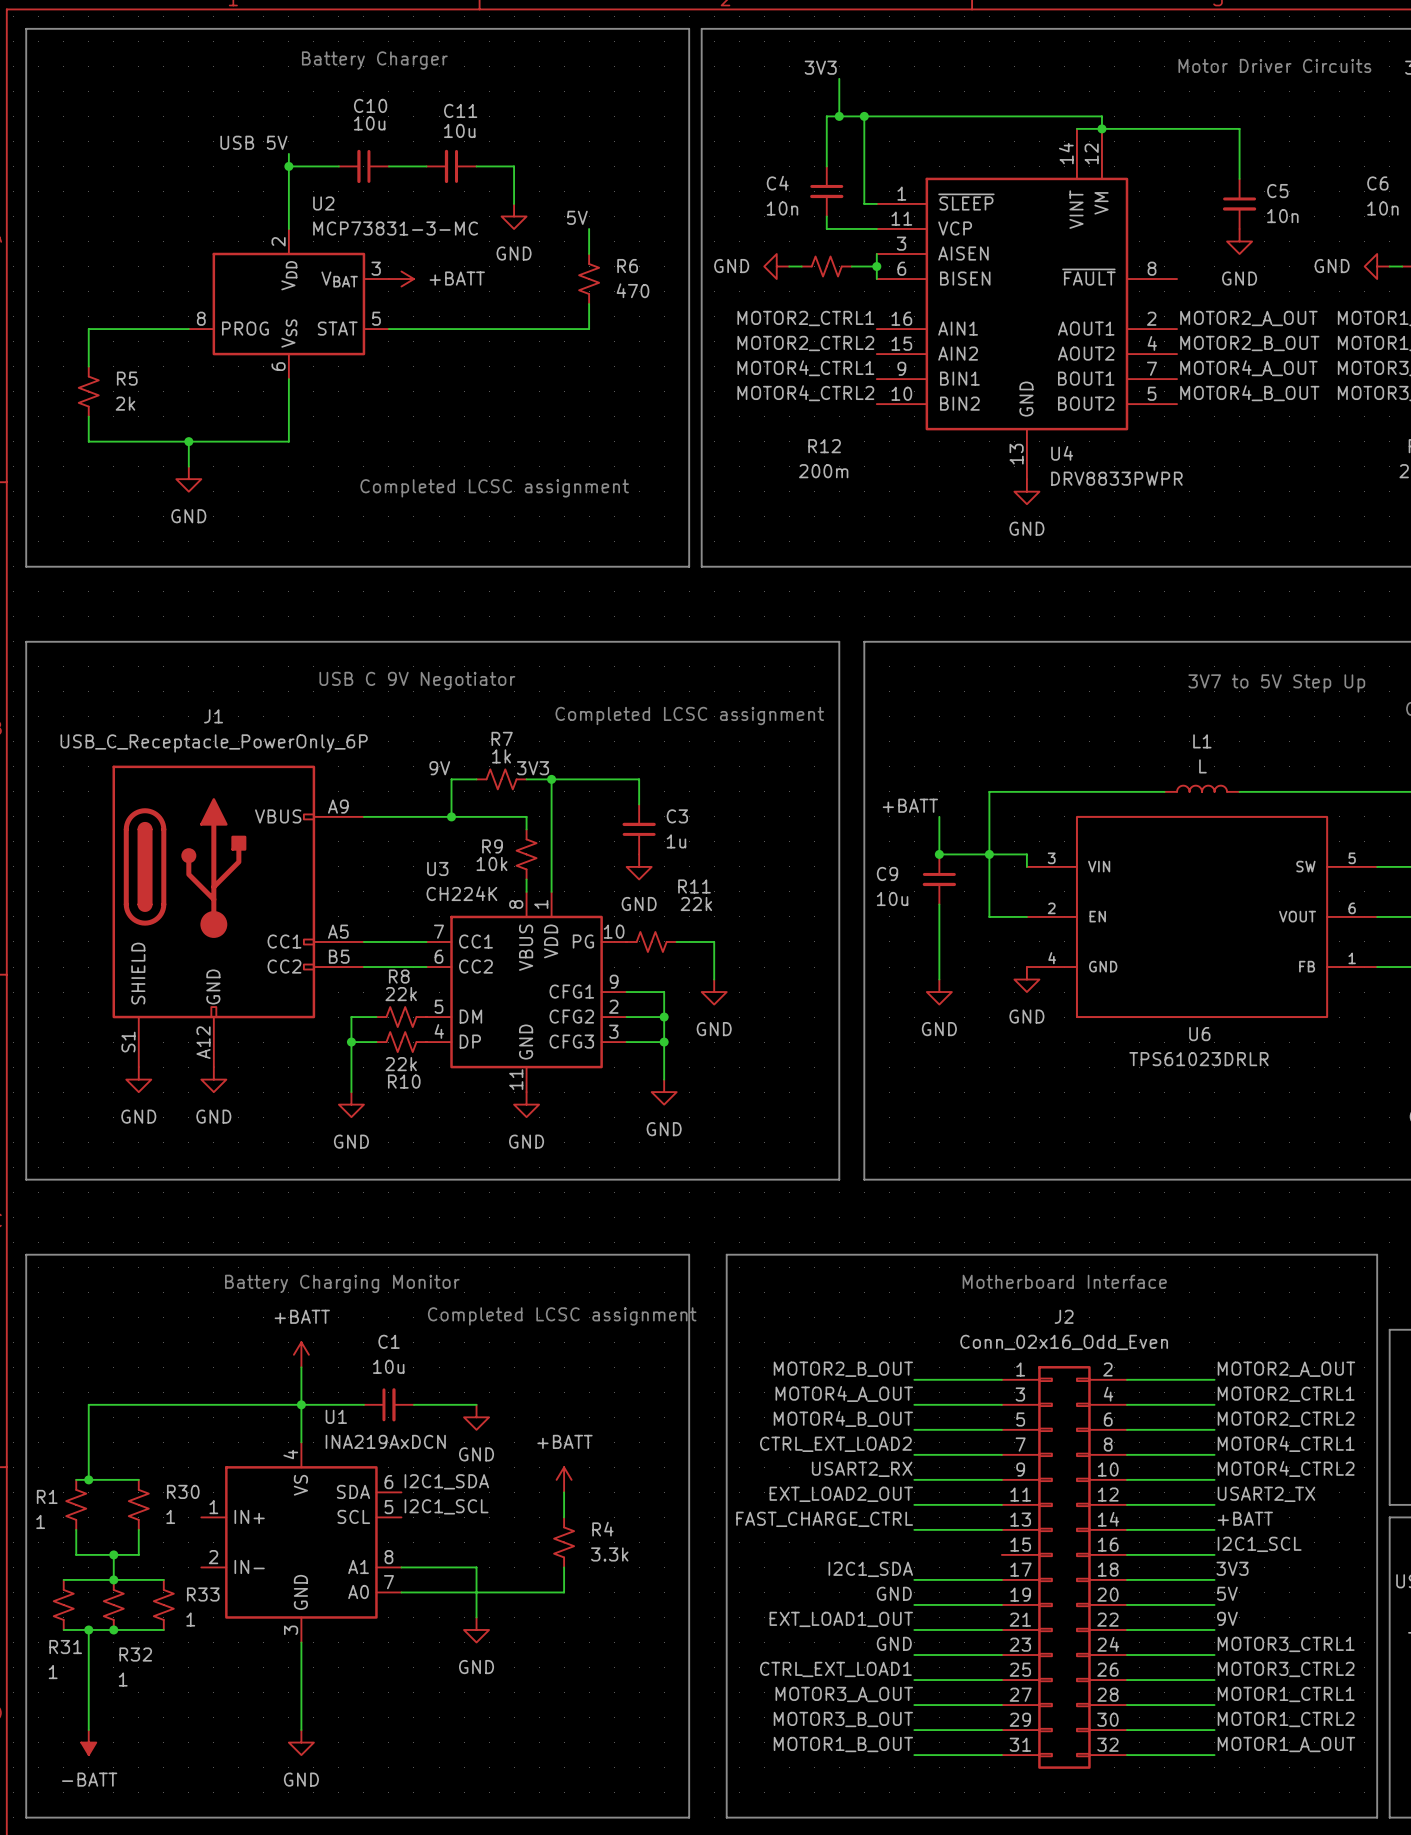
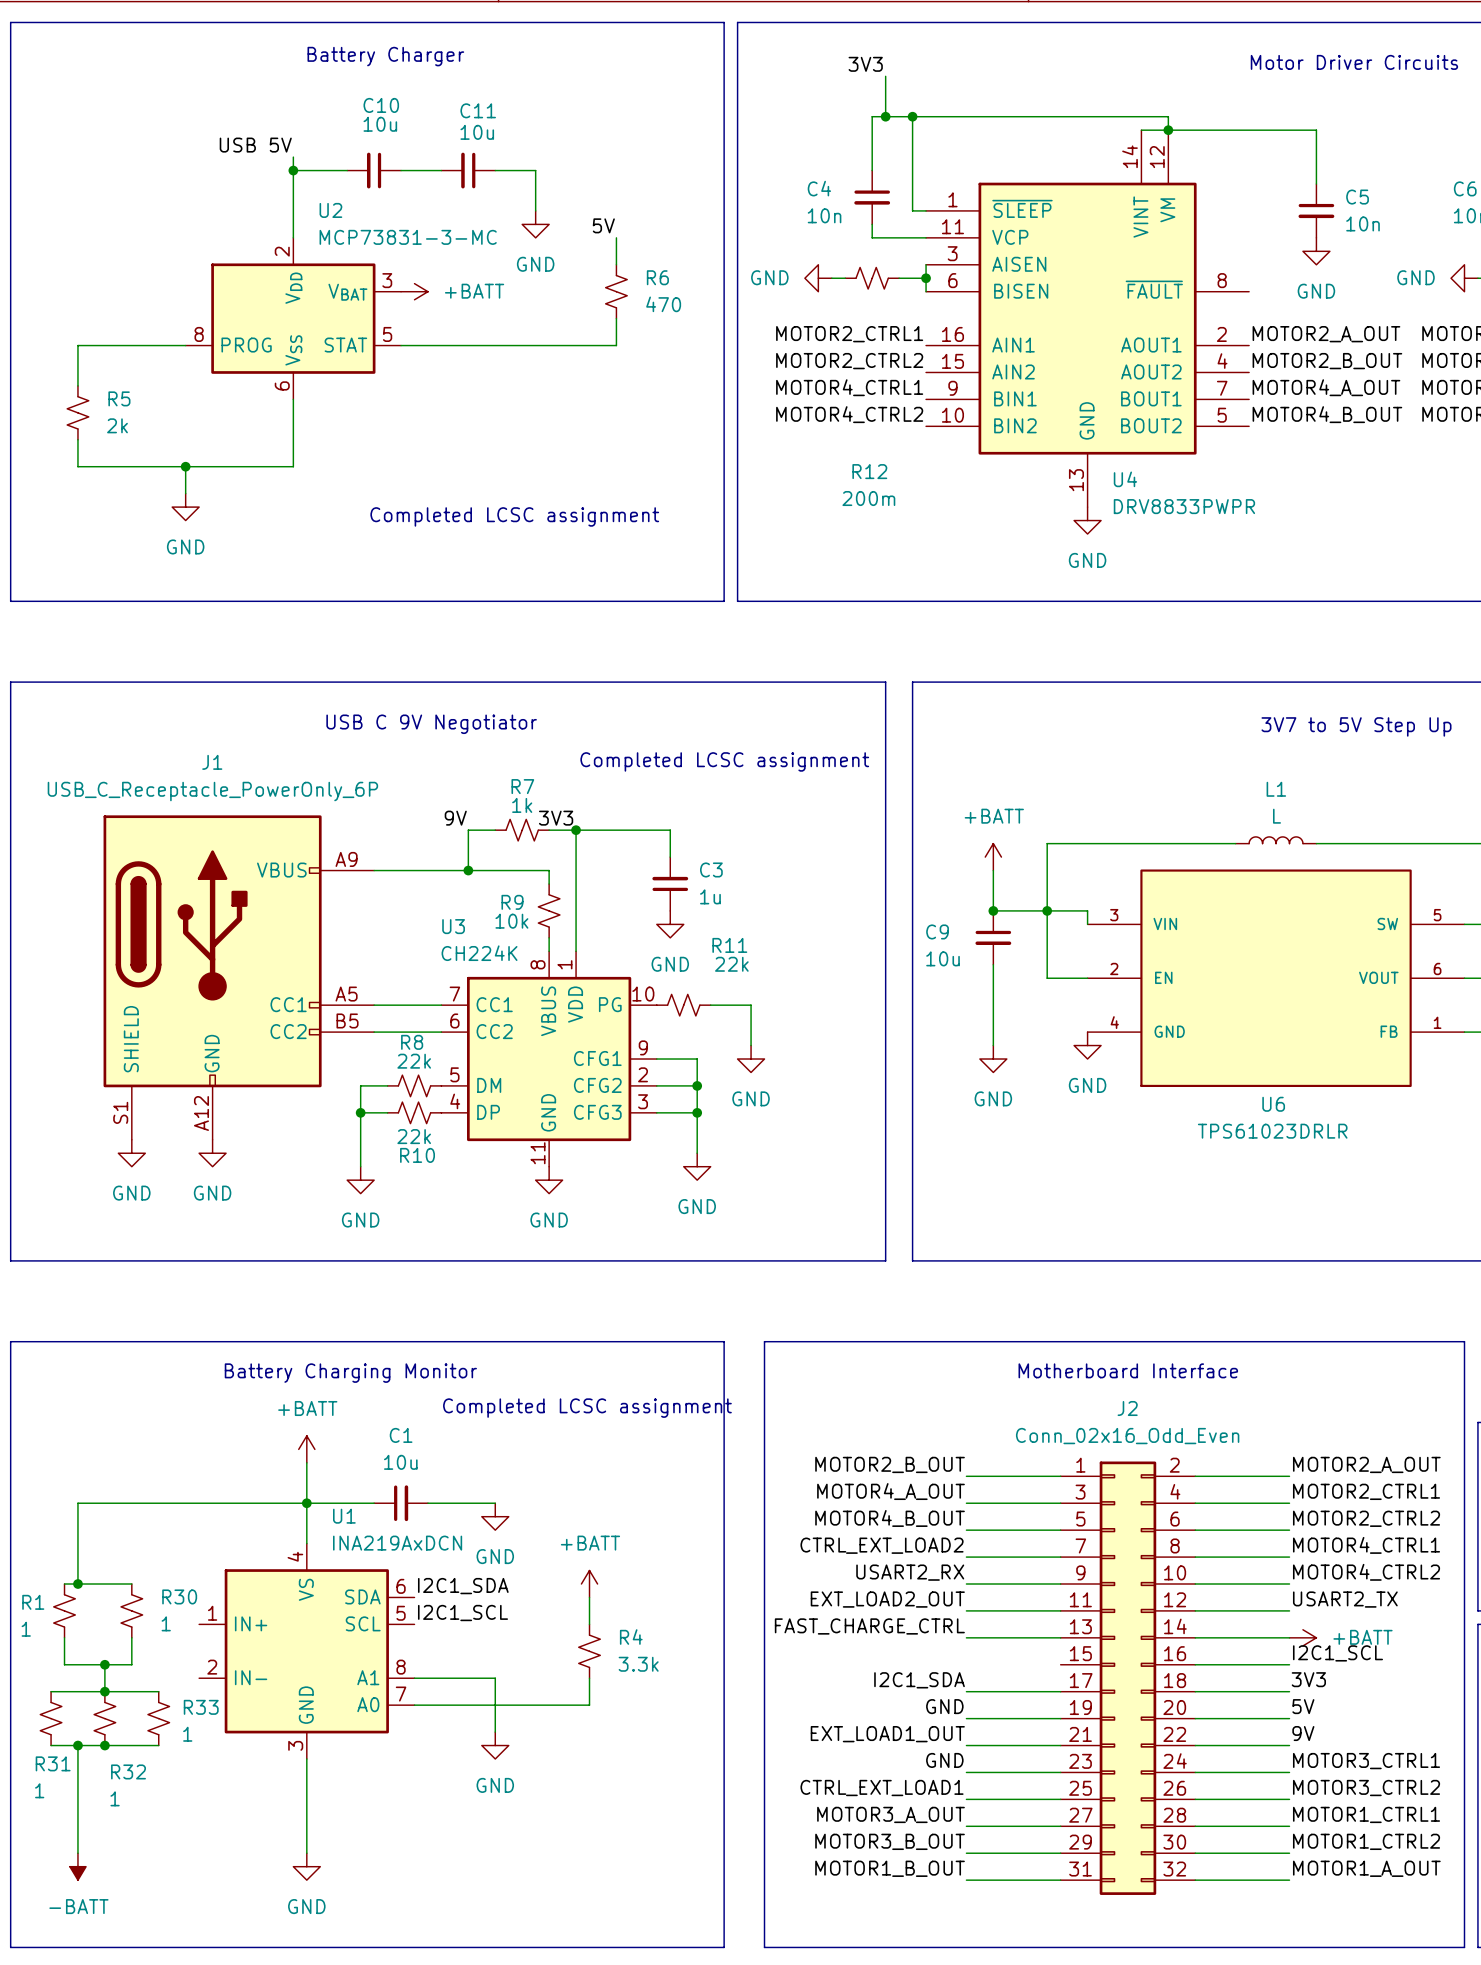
power symbol: none -> +BATT (993, 857)
label: +BATT (910, 805) -> none
label: +BATT (1245, 1518) -> none
power symbol: none -> +BATT (1302, 1637)

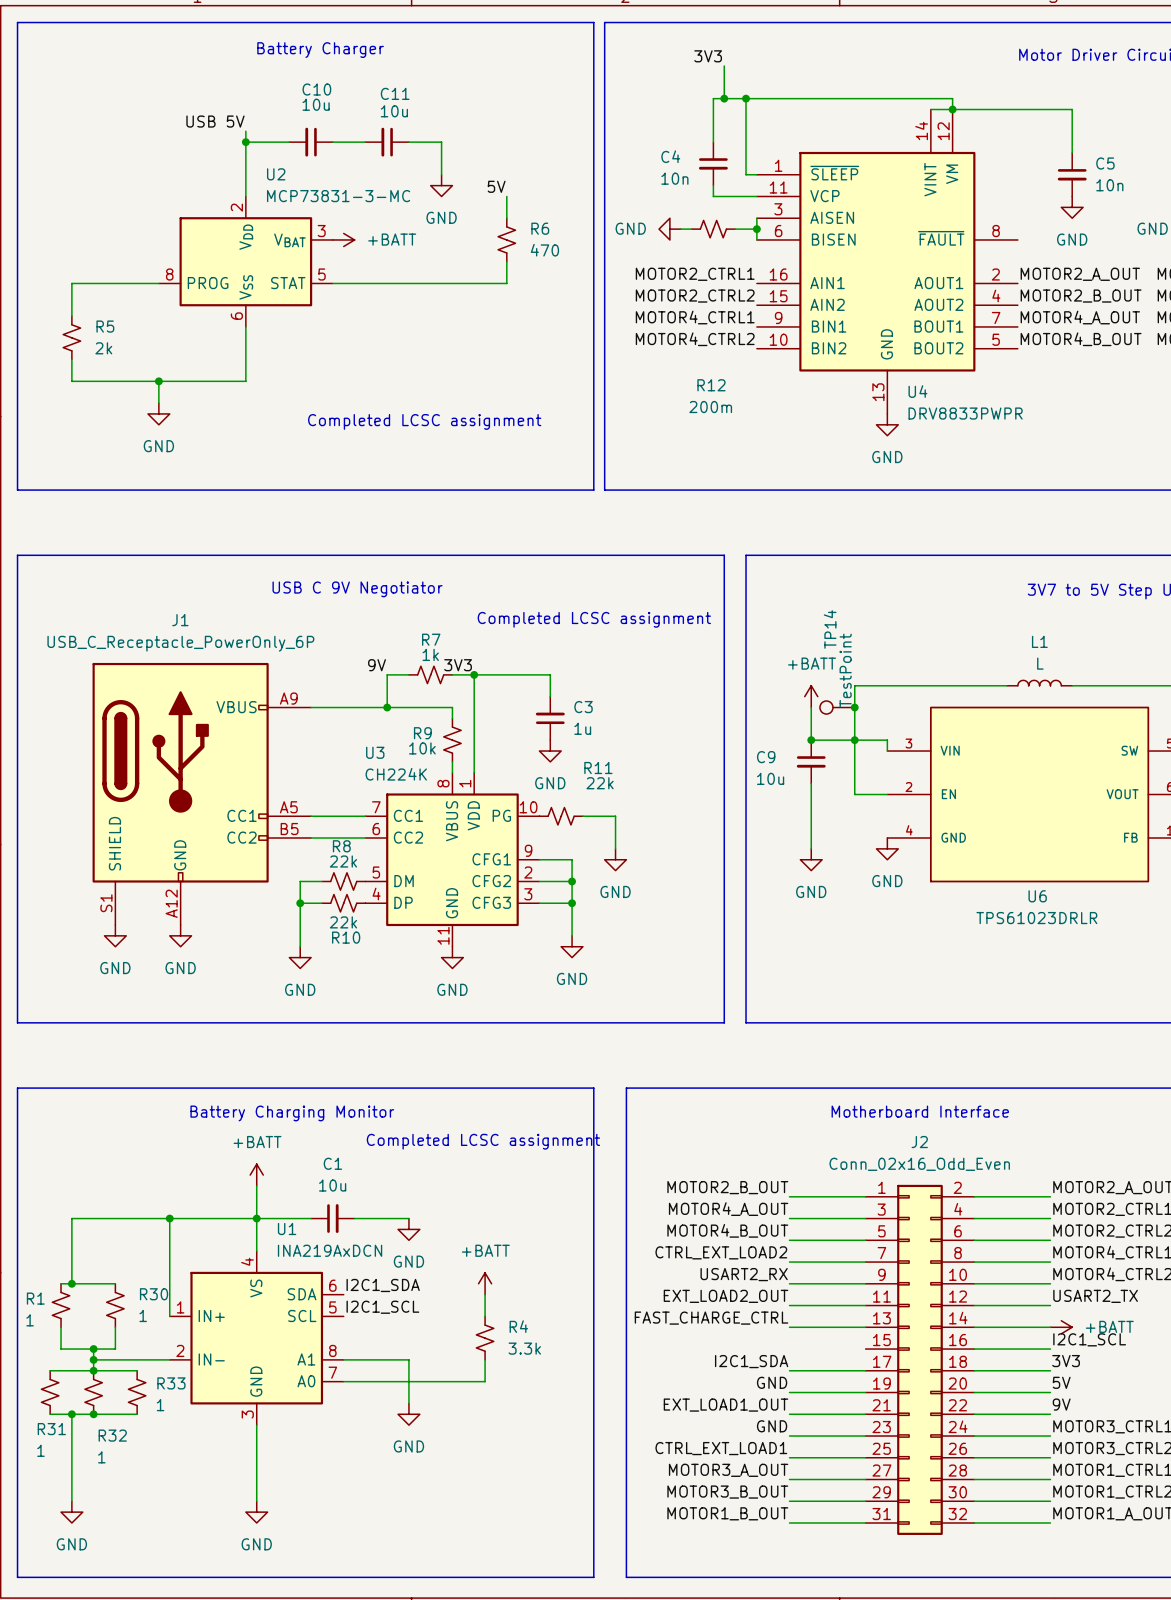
TP14: none -> TestPoint (837, 707)
junction: none -> (854, 707)
wire: none -> (169, 1218) (169, 1316)
junction: none -> (169, 1218)
wire: none -> (93, 1359) (169, 1359)
junction: none -> (93, 1359)
power symbol: -BATT (77, 1866) -> GND (71, 1512)

